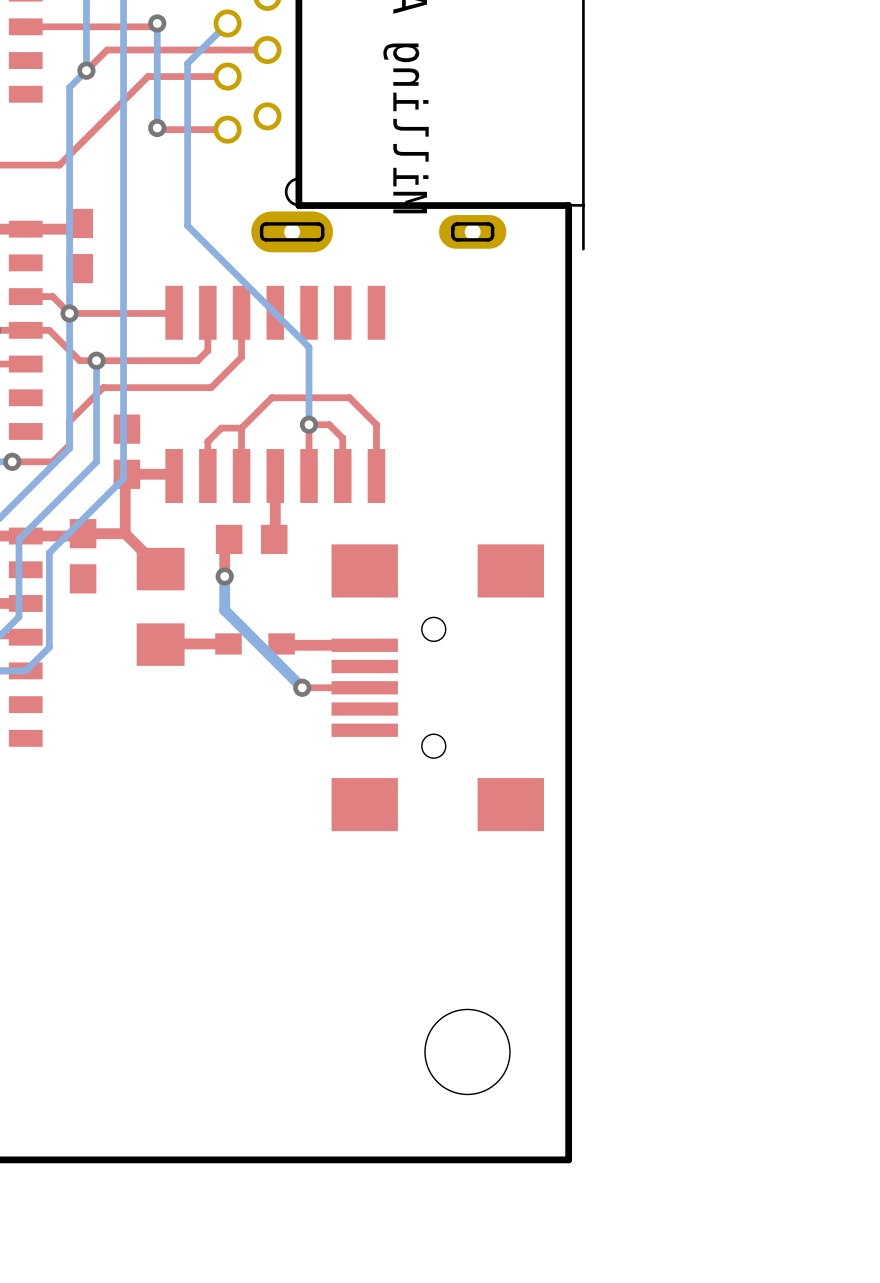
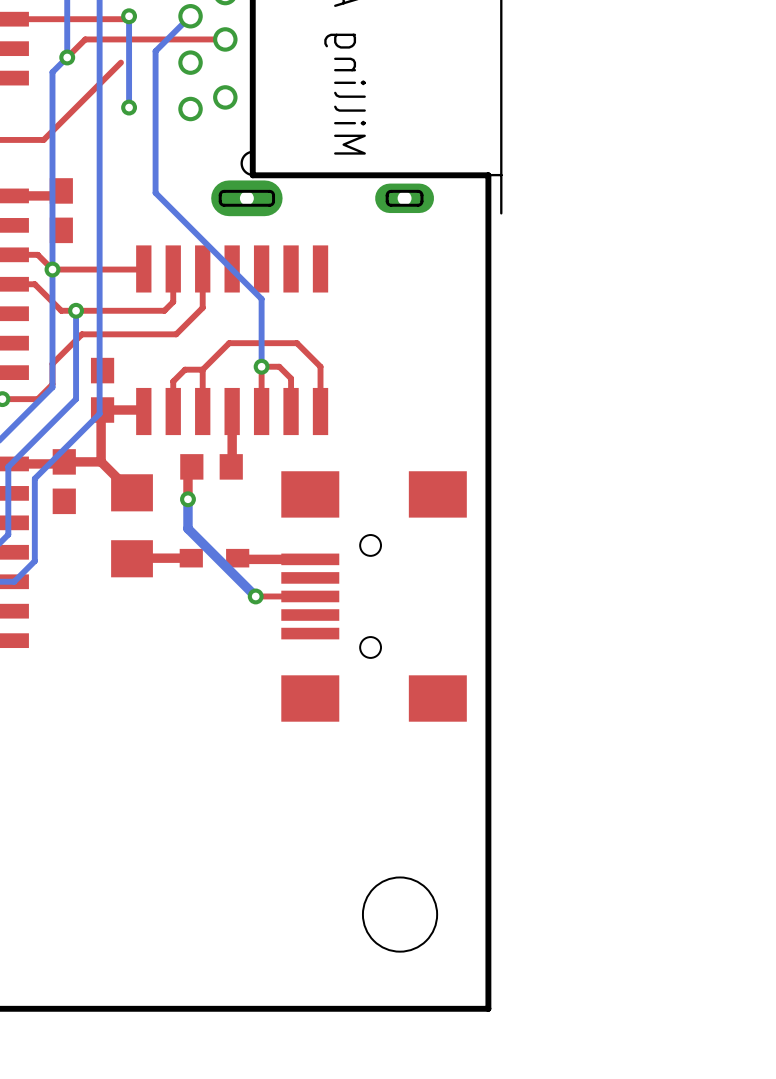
top track: (227, 76) (147, 76) -> none
top track: (227, 129) (158, 129) -> none

